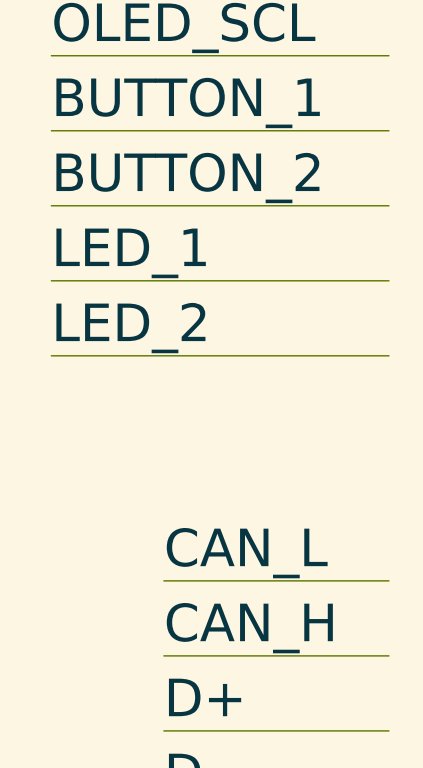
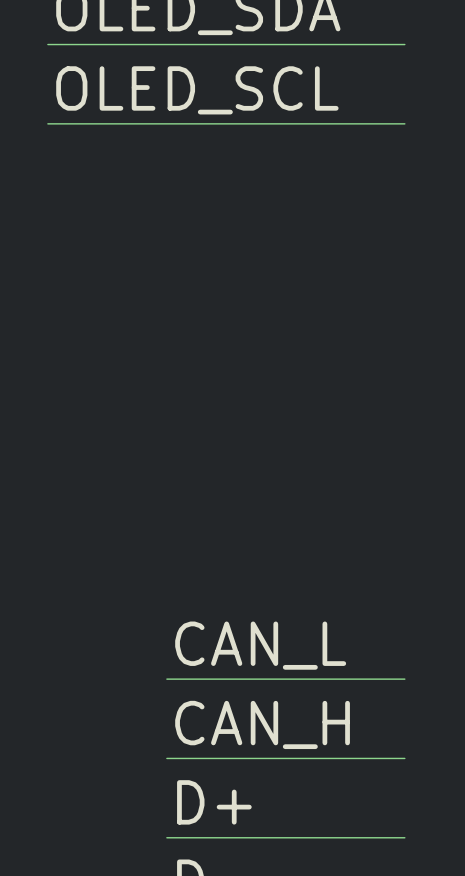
label: BUTTON_1 (188, 103) -> none
wire: (51, 130) (388, 130) -> none
label: BUTTON_2 (187, 178) -> none
wire: (51, 205) (388, 205) -> none
label: LED_1 (131, 253) -> none
wire: (51, 280) (388, 280) -> none
label: LED_2 (130, 328) -> none
wire: (51, 355) (388, 355) -> none

